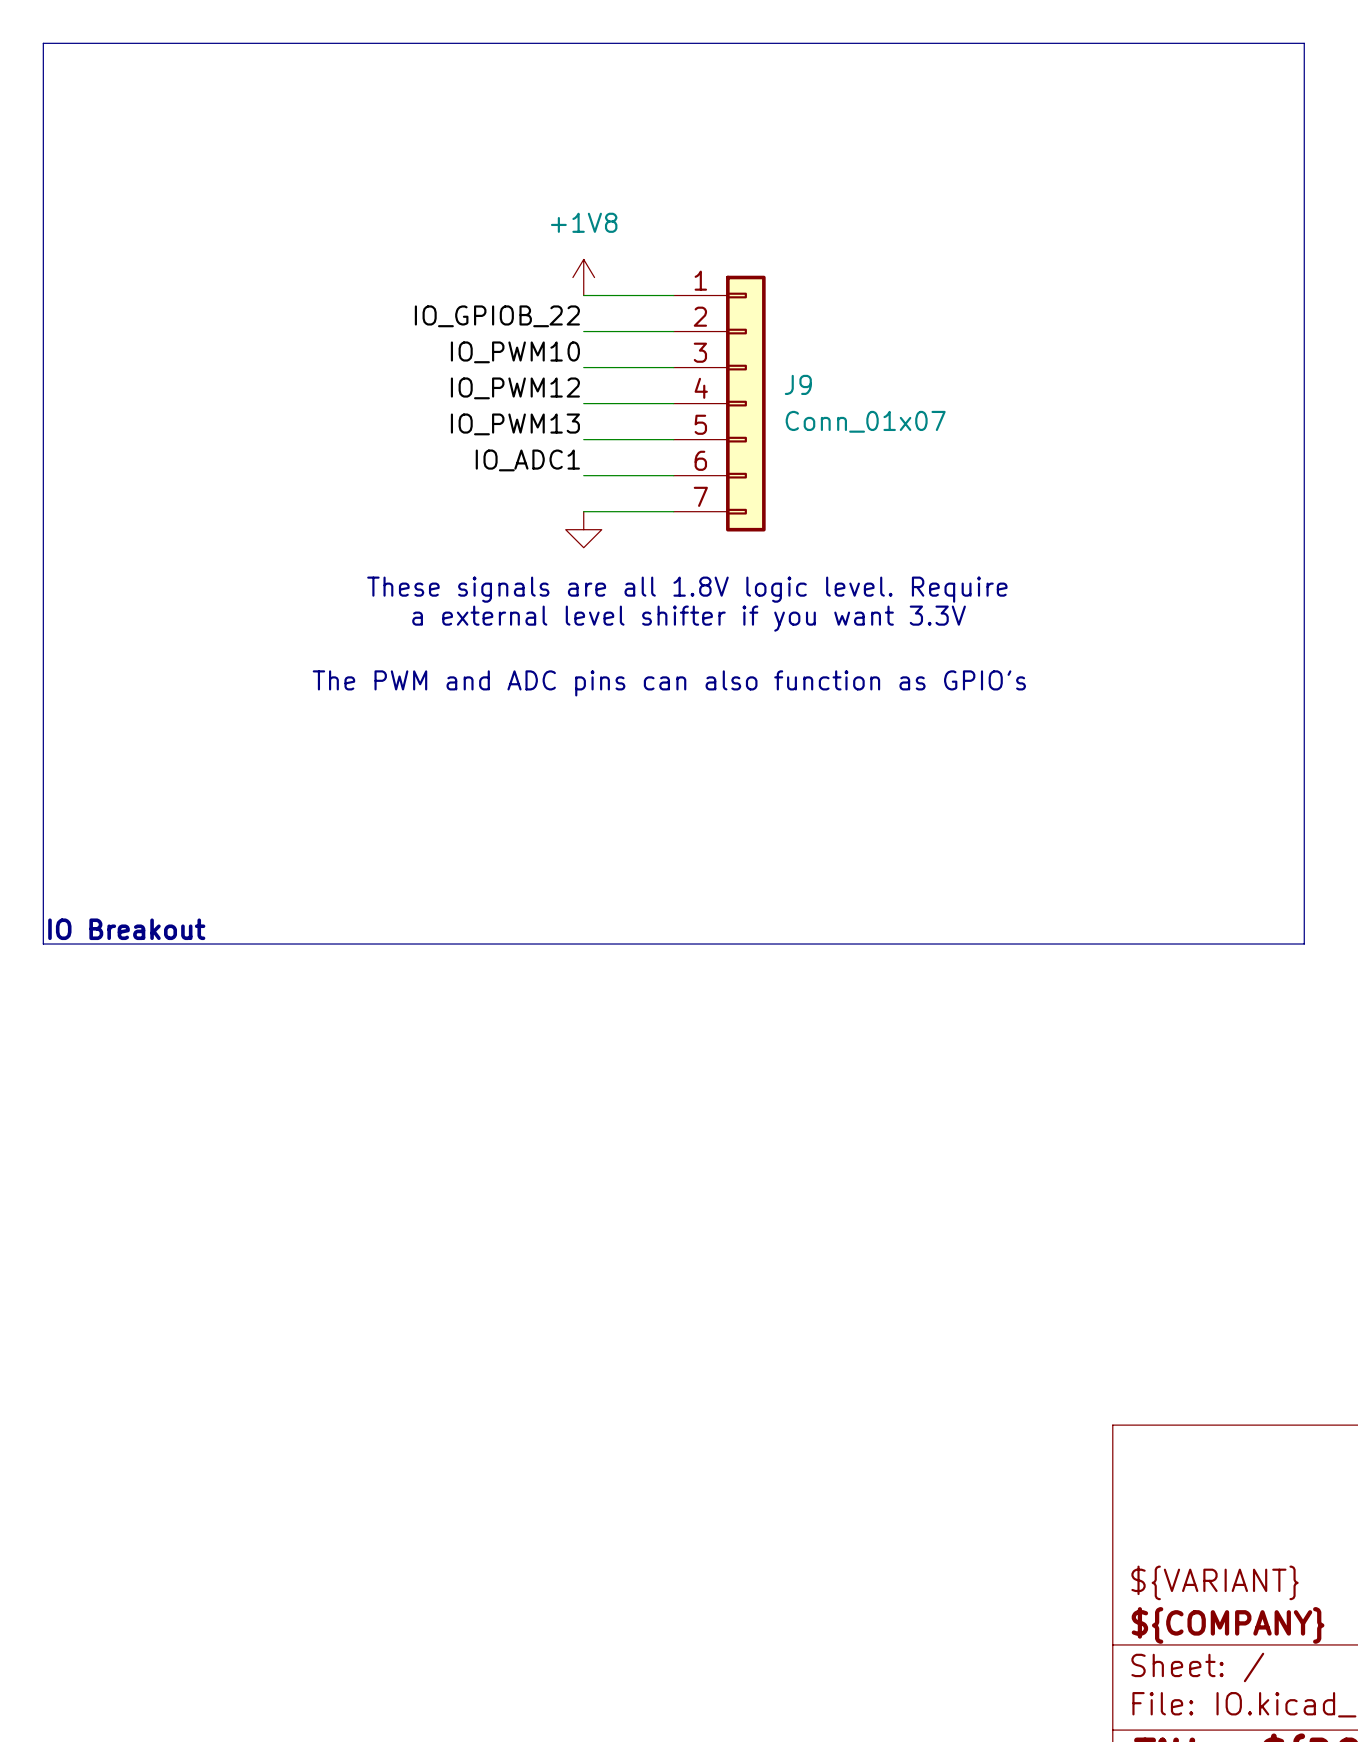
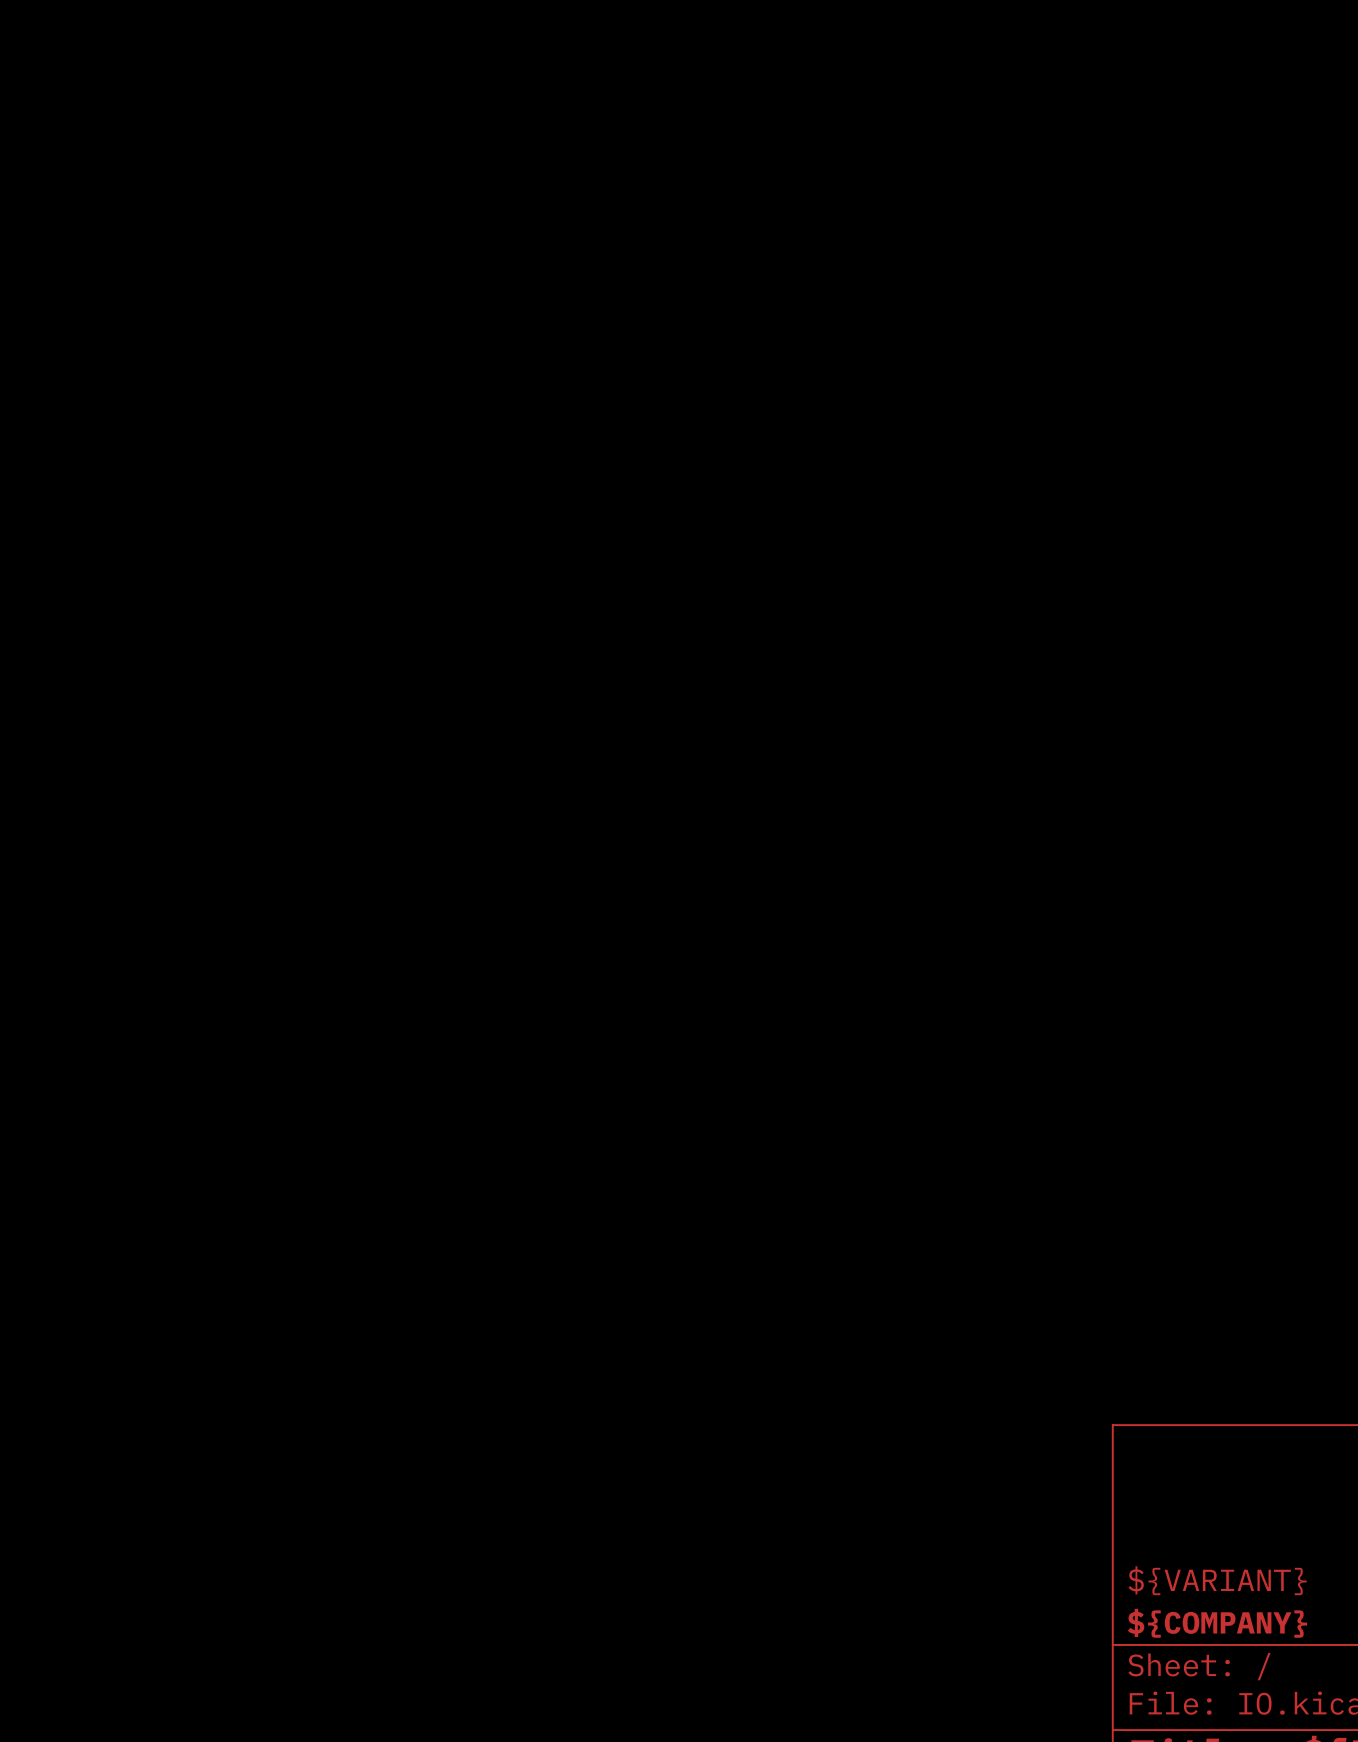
line: (43, 43) (1304, 43) (1304, 944) (43, 944) (43, 43) -> none
power symbol: +1V8 (583, 277) -> none
wire: (583, 295) (673, 295) -> none
label: IO_GPIOB_22 (497, 316) -> none
wire: (583, 331) (673, 331) -> none
label: IO_PWM10 (515, 352) -> none
wire: (583, 367) (673, 367) -> none
label: IO_PWM12 (515, 388) -> none
wire: (583, 403) (673, 403) -> none
J9: Conn_01x07 (719, 403) -> none
label: IO_PWM13 (515, 424) -> none
wire: (583, 439) (673, 439) -> none
label: IO_ADC1 (527, 460) -> none
wire: (583, 475) (673, 475) -> none
wire: (583, 511) (673, 511) -> none
power symbol: (583, 529) -> none
text: These signals are all 1.8V logic level. Require (687, 589) -> none
text: a external level shifter if you want 3.3V (689, 618) -> none
text: The PWM and ADC pins can also function as GPIO's (669, 683) -> none
text: IO Breakout (126, 929) -> none

